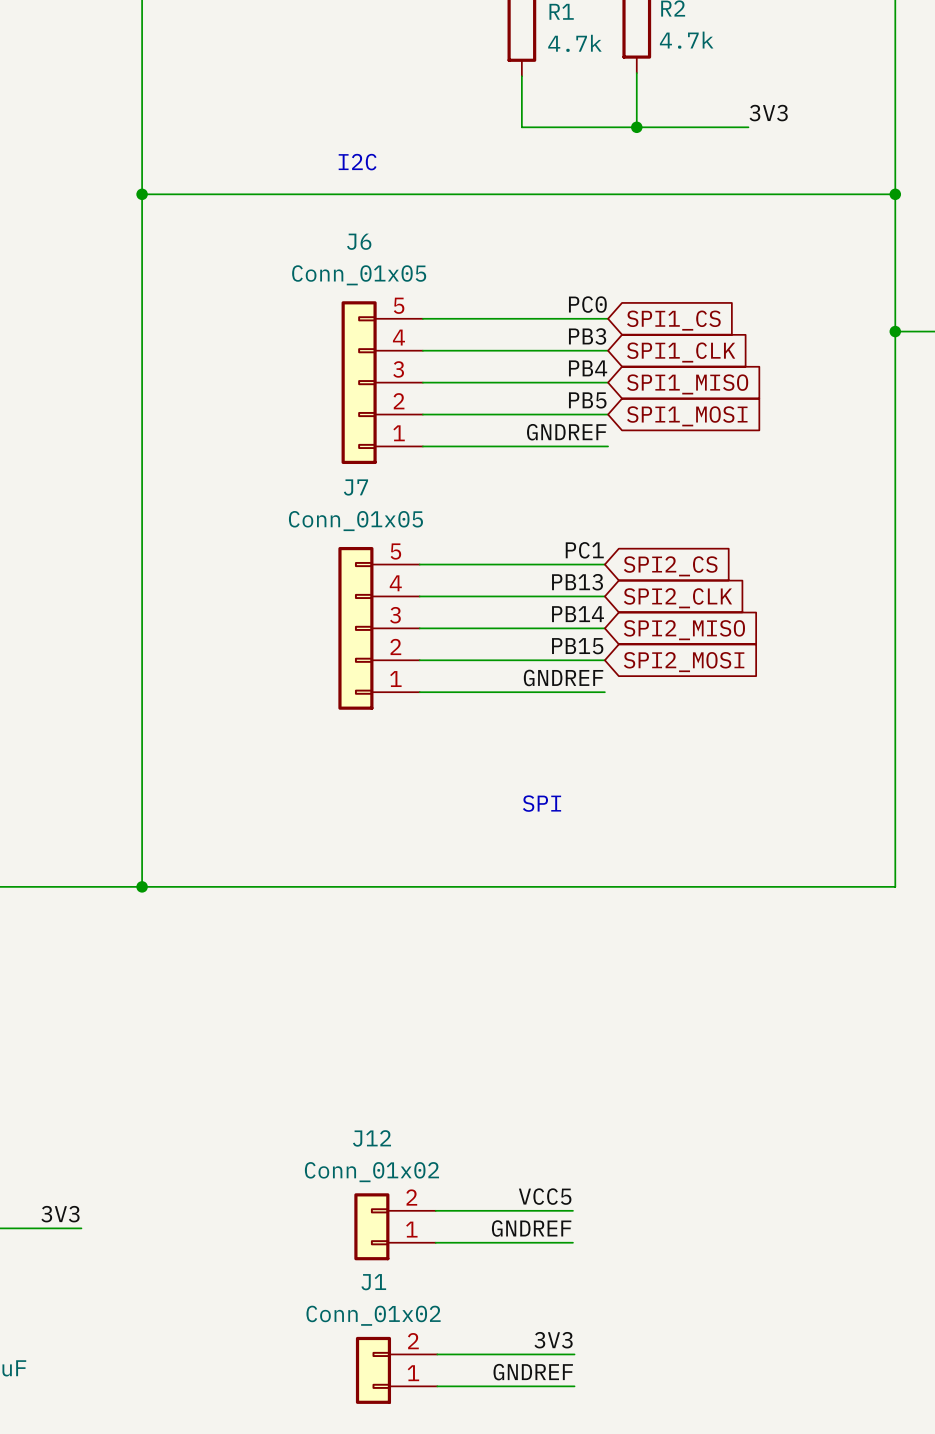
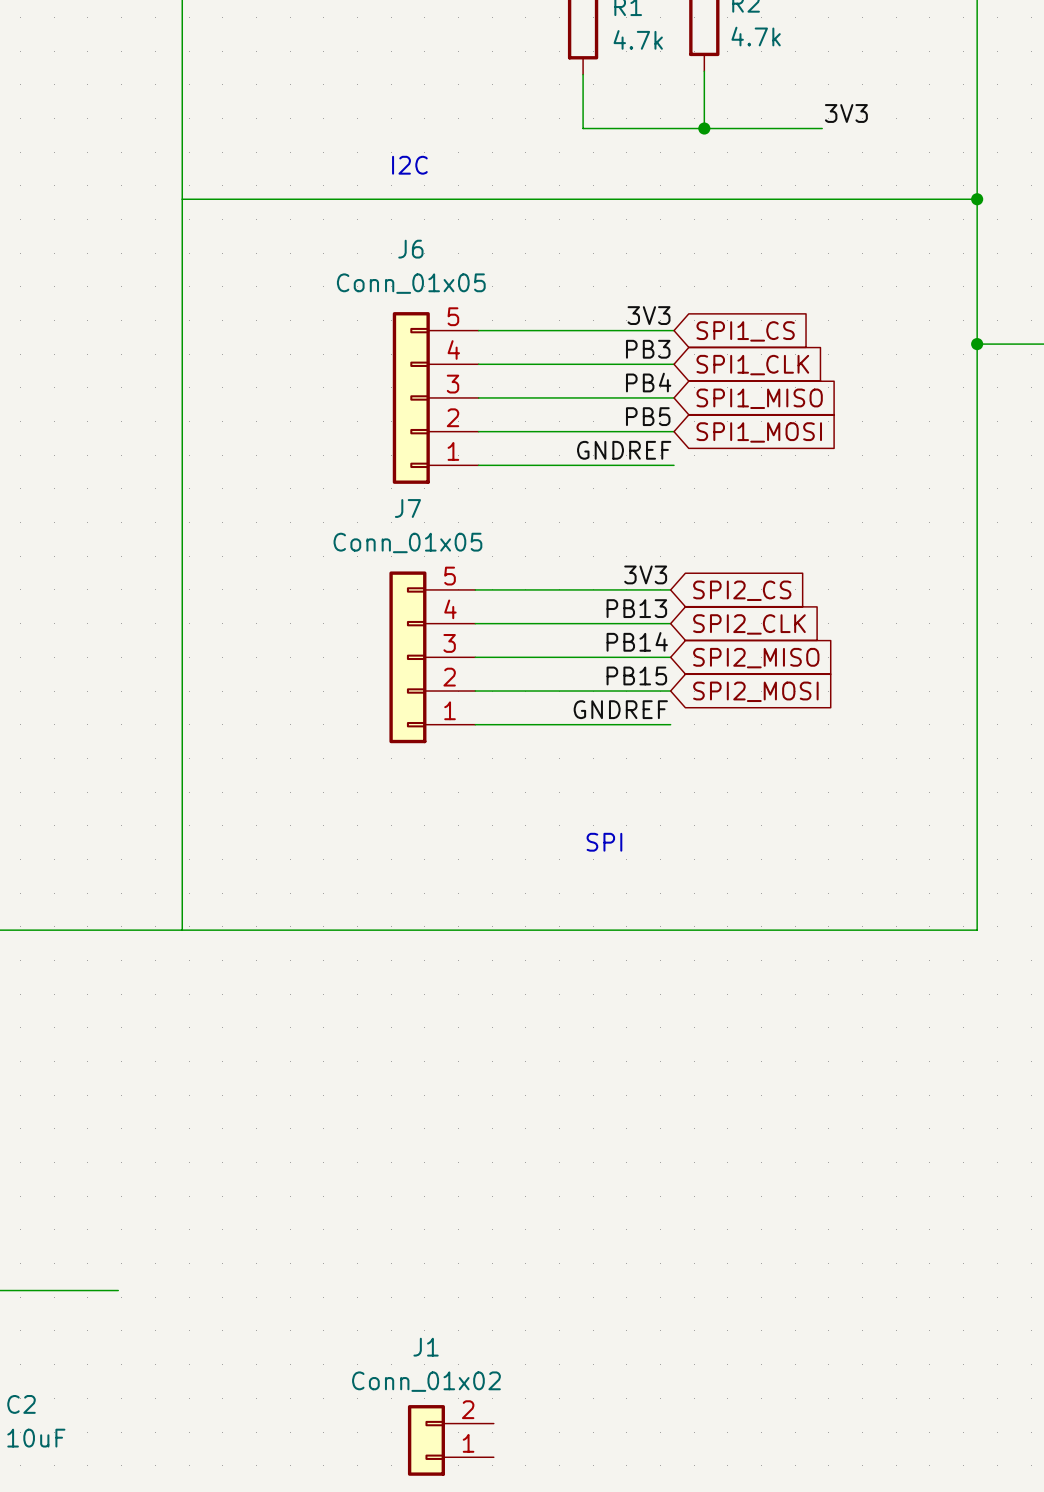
junction: (142, 194) -> none
label: PC0 (587, 304) -> 3V3 (649, 315)
label: PC1 (584, 550) -> 3V3 (645, 574)
junction: (142, 886) -> none
label: VCC5 (545, 1196) -> none
wire: (435, 1210) (572, 1210) -> none
label: 3V3 (60, 1214) -> none
J12: Conn_01x02 (395, 1226) -> none
label: GNDREF (531, 1228) -> none
wire: (435, 1242) (572, 1242) -> none
label: 3V3 (553, 1340) -> none
wire: (437, 1354) (574, 1354) -> none
label: GNDREF (533, 1372) -> none
wire: (437, 1386) (574, 1386) -> none

